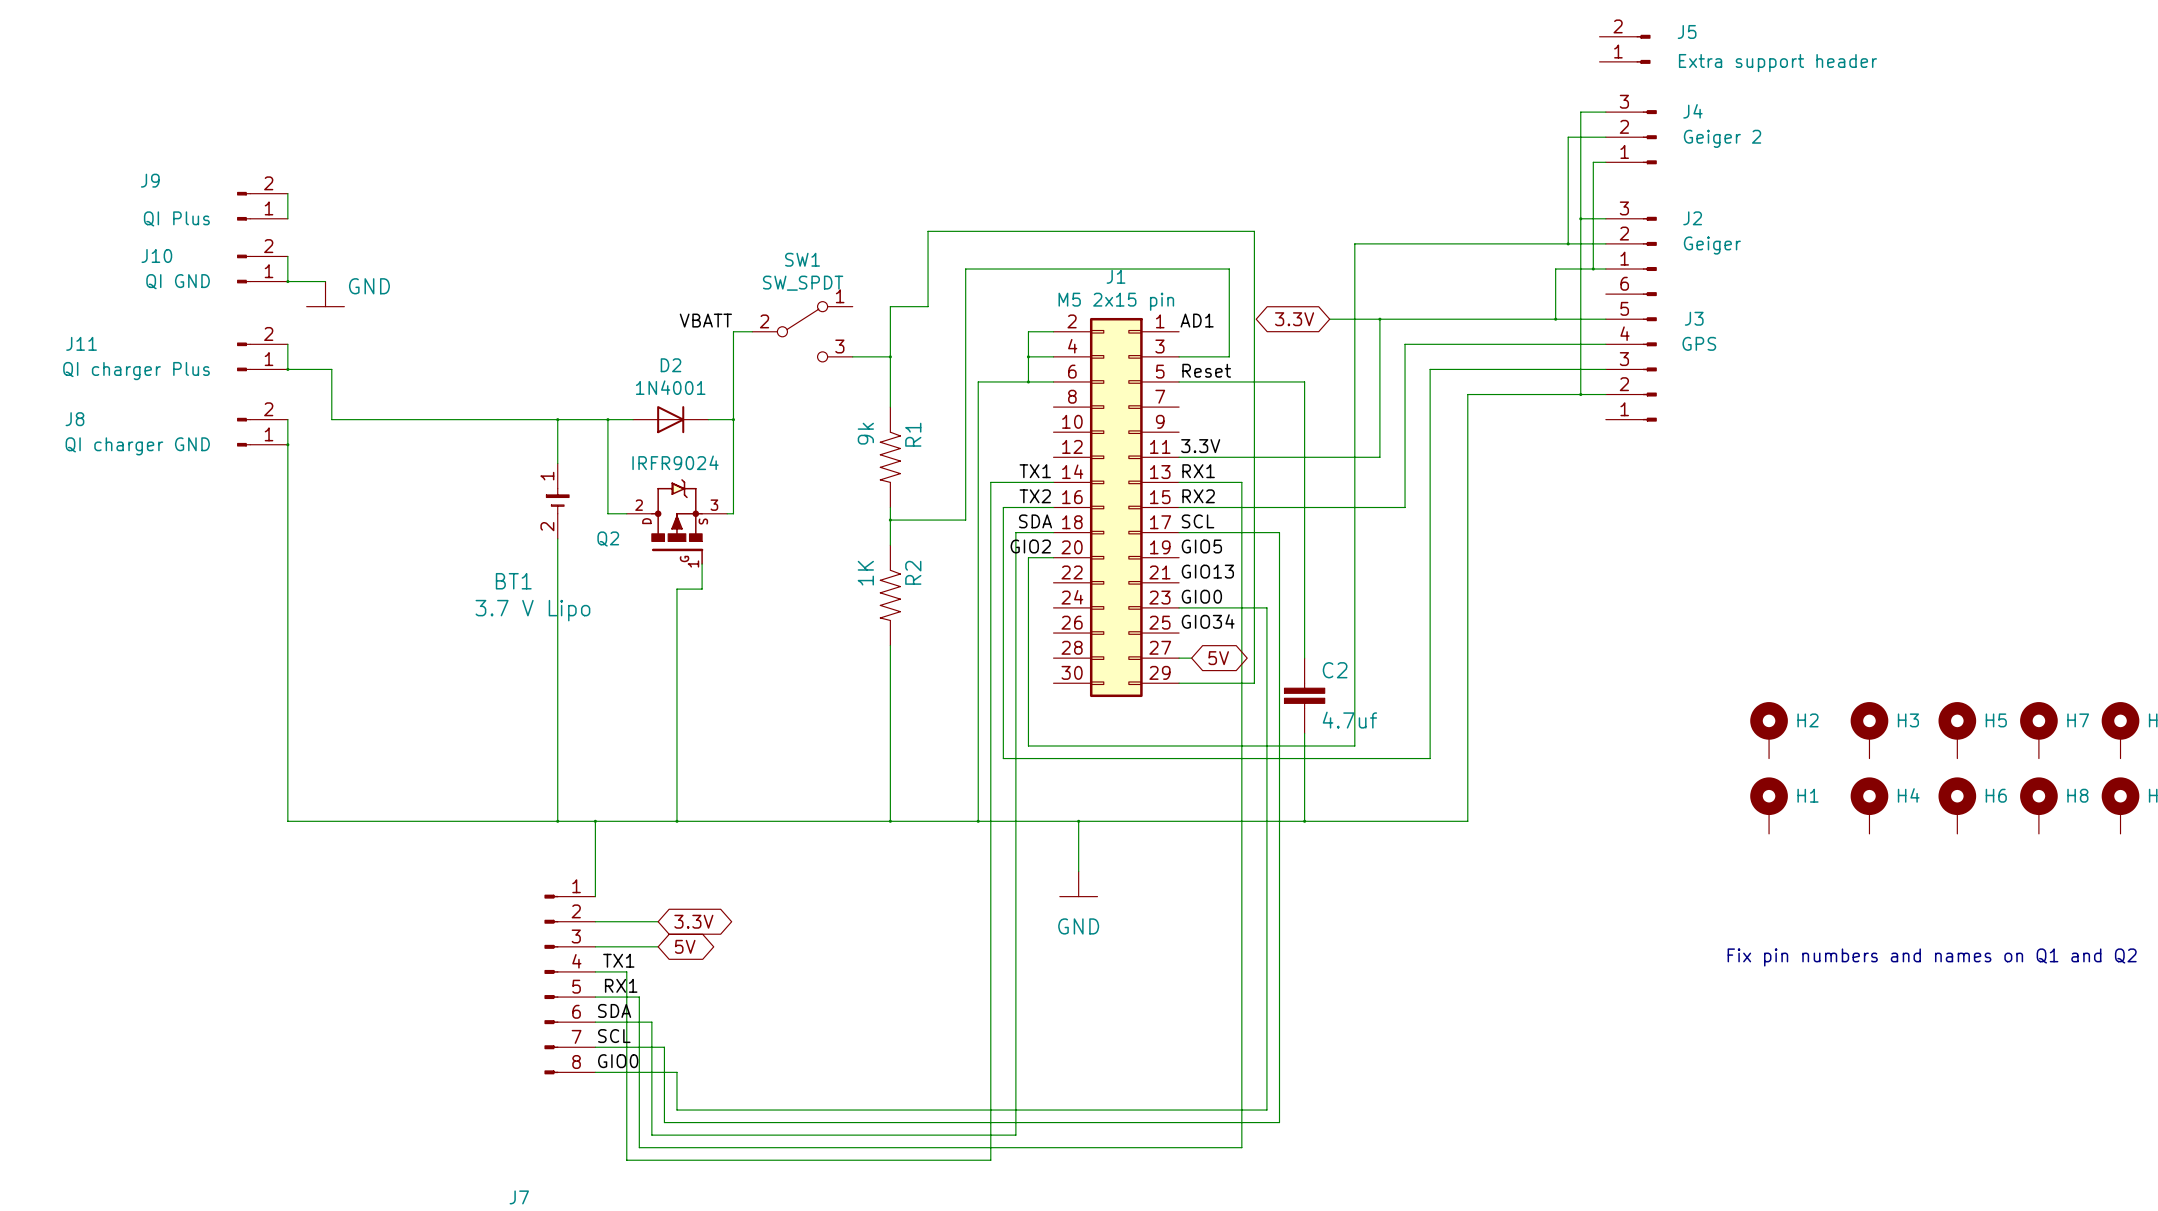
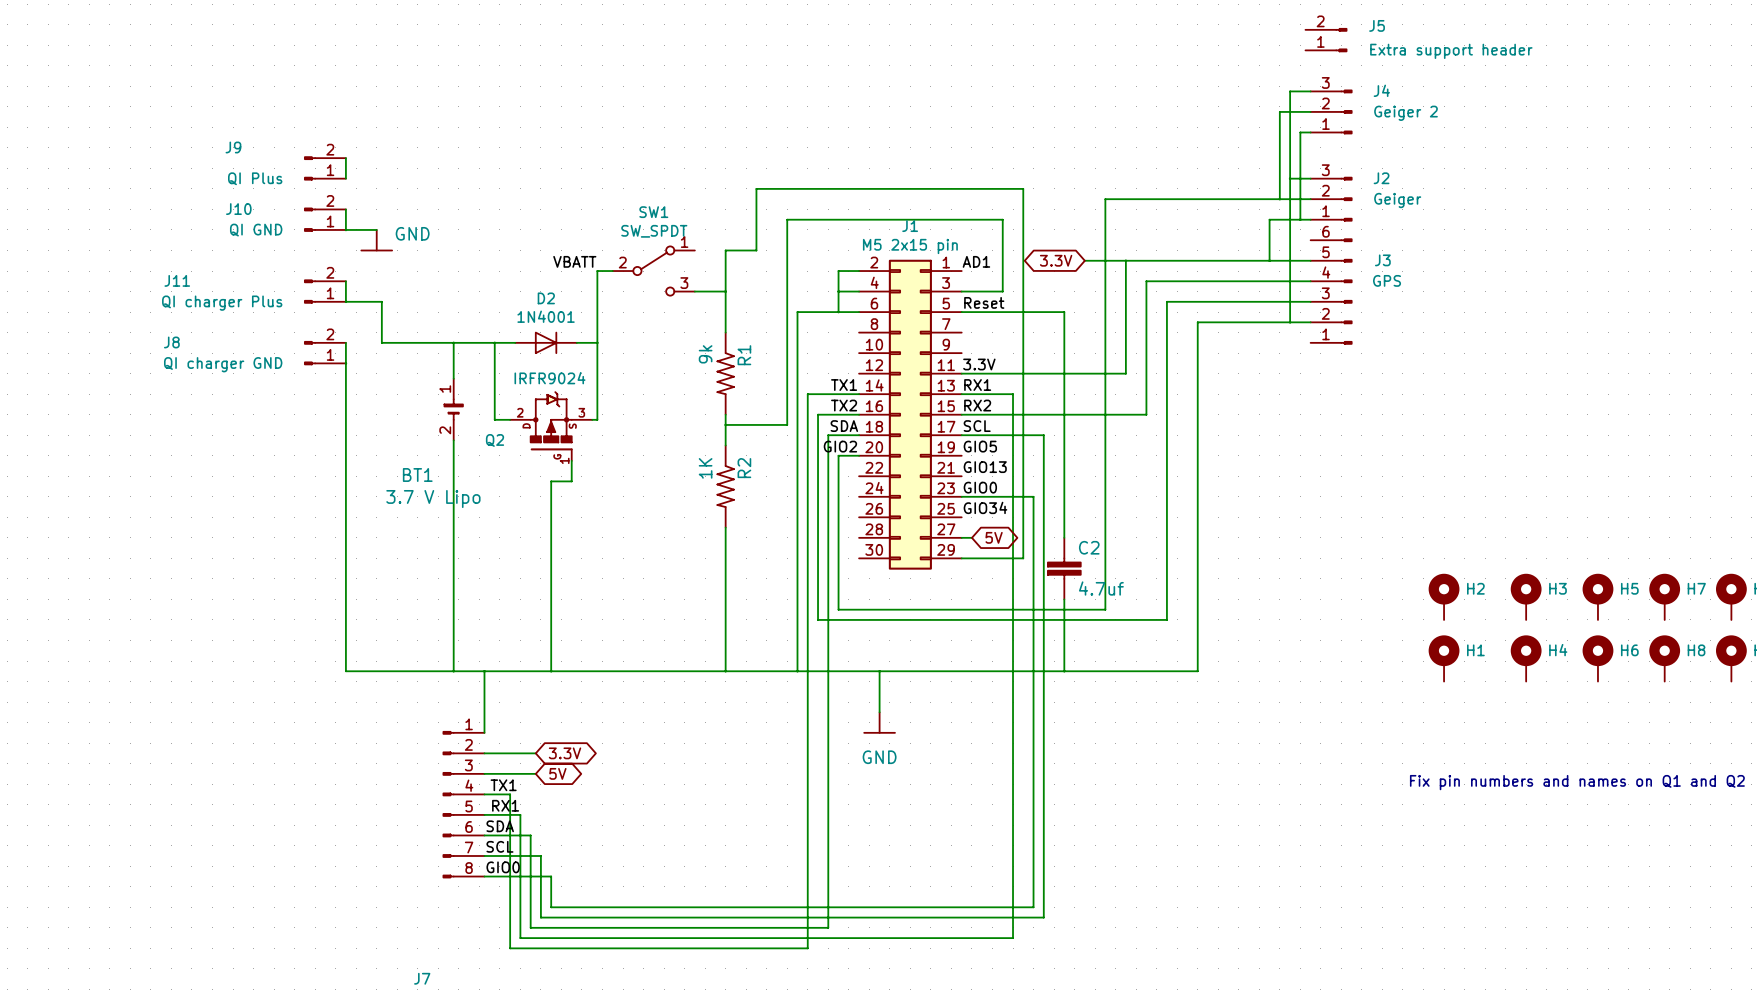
wire: (287, 193) (287, 218) -> (345, 158) (345, 178)
J9 position: (262, 206) -> (325, 168)
wire: (287, 256) (287, 281) (325, 281) -> (345, 209) (345, 229) (376, 229)
J10 position: (262, 269) -> (325, 219)
junction: (287, 281) -> none
power symbol position: GND (325, 294) -> GND (376, 240)
wire: (287, 344) (287, 369) (331, 369) (331, 419) (469, 419) -> (345, 281) (345, 301) (381, 301) (381, 342)
J11 position: (262, 356) -> (325, 291)
junction: (287, 369) -> none
wire: (287, 419) (287, 821) (425, 821) -> (345, 342) (345, 671)
J8 position: (262, 432) -> (325, 353)
junction: (287, 444) -> none

